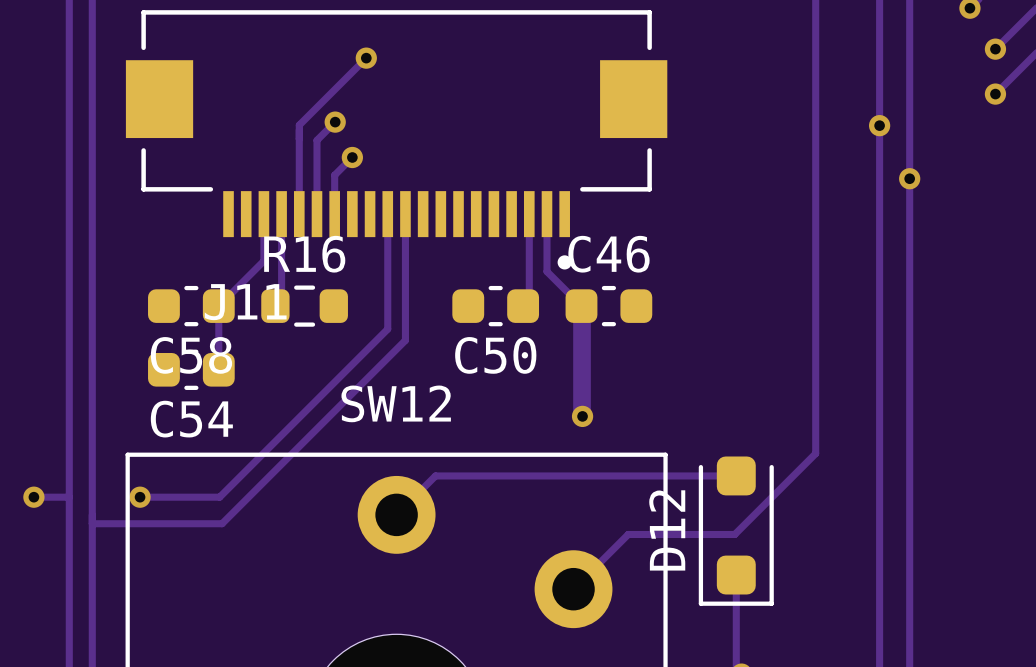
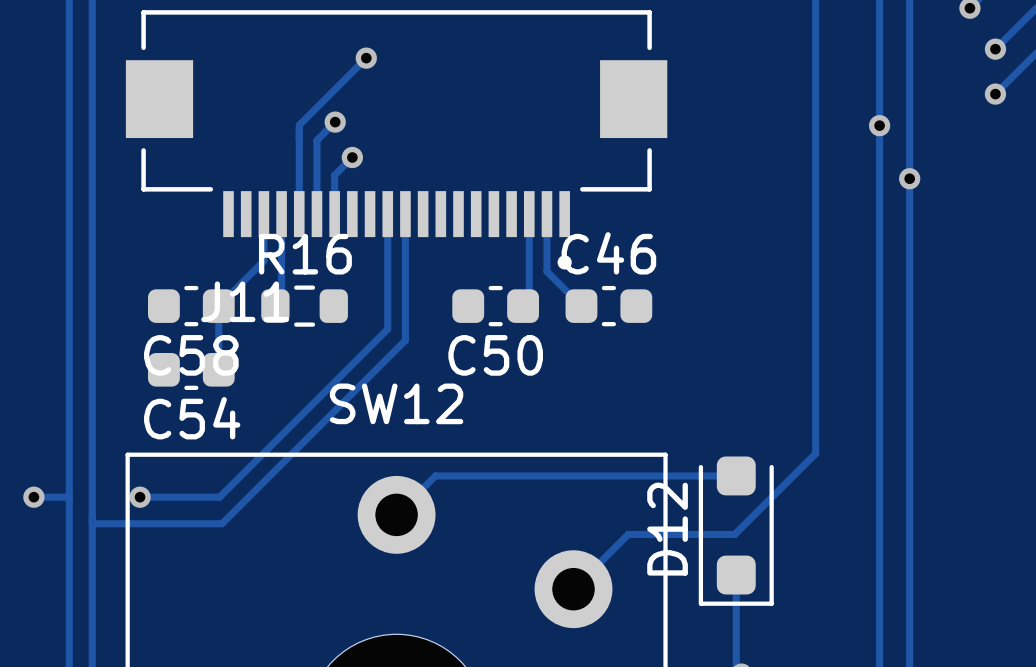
track: (582, 305) (582, 416) -> none
via: (582, 416) -> none

